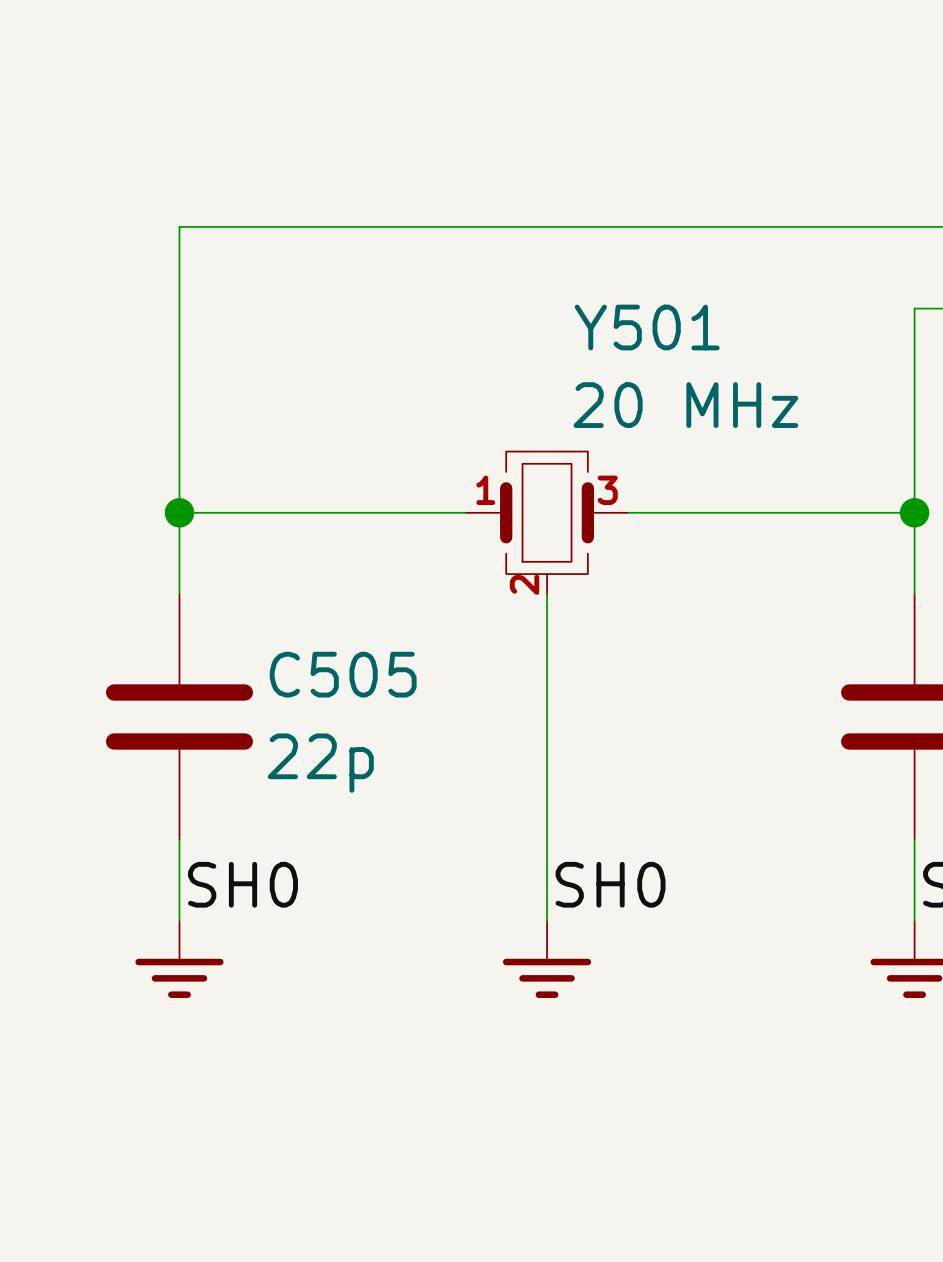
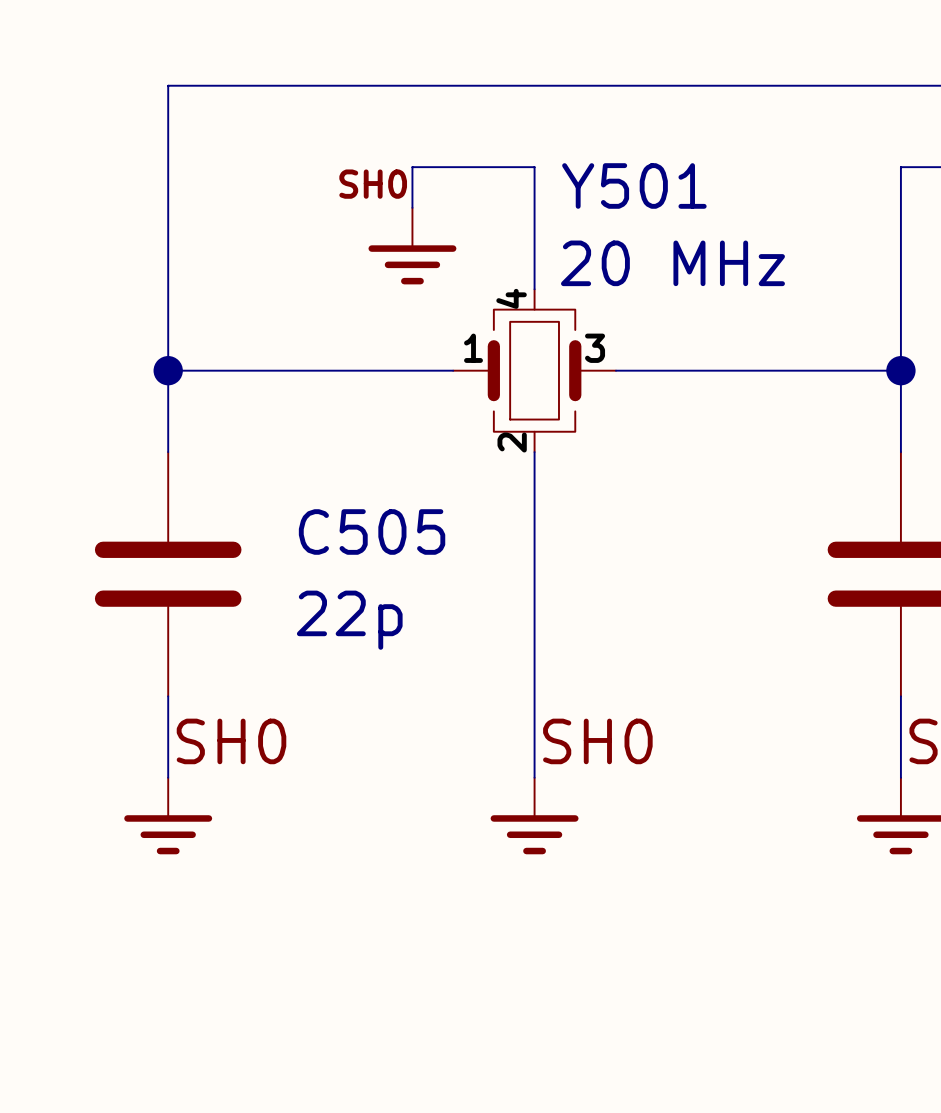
label: none -> SH0 (373, 184)
wire: none -> (412, 207) (412, 167) (534, 167) (534, 289)
part: none -> (412, 246)
Y501 symbol: [465, 451, 629, 595] -> [453, 289, 616, 453]
C505 name position: C505 (343, 674) -> C505 (372, 531)
C505 value position: 22p (320, 763) -> 22p (349, 620)

